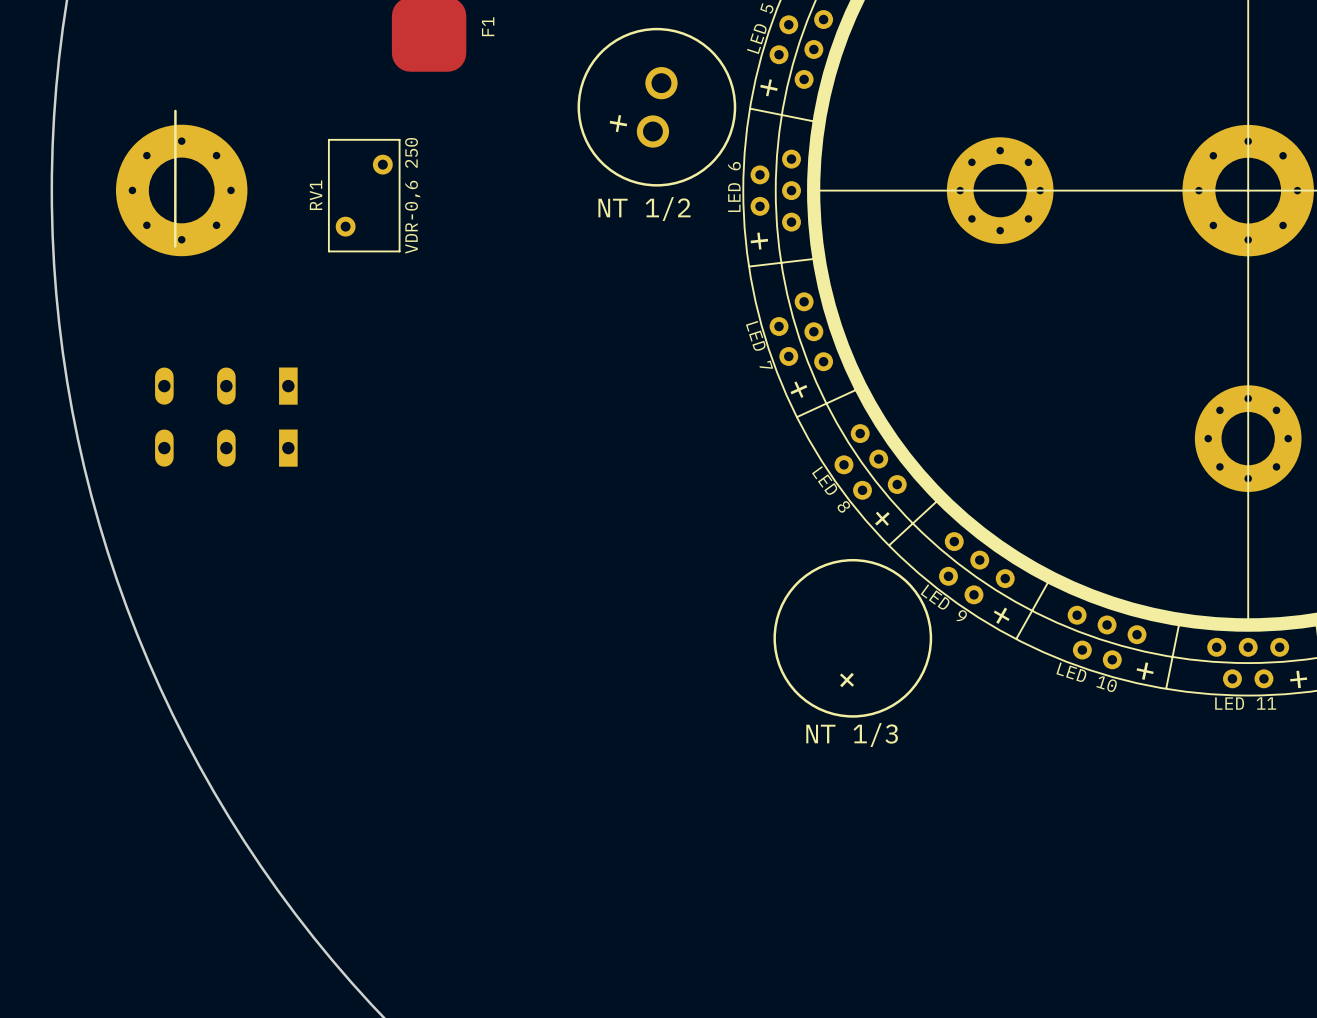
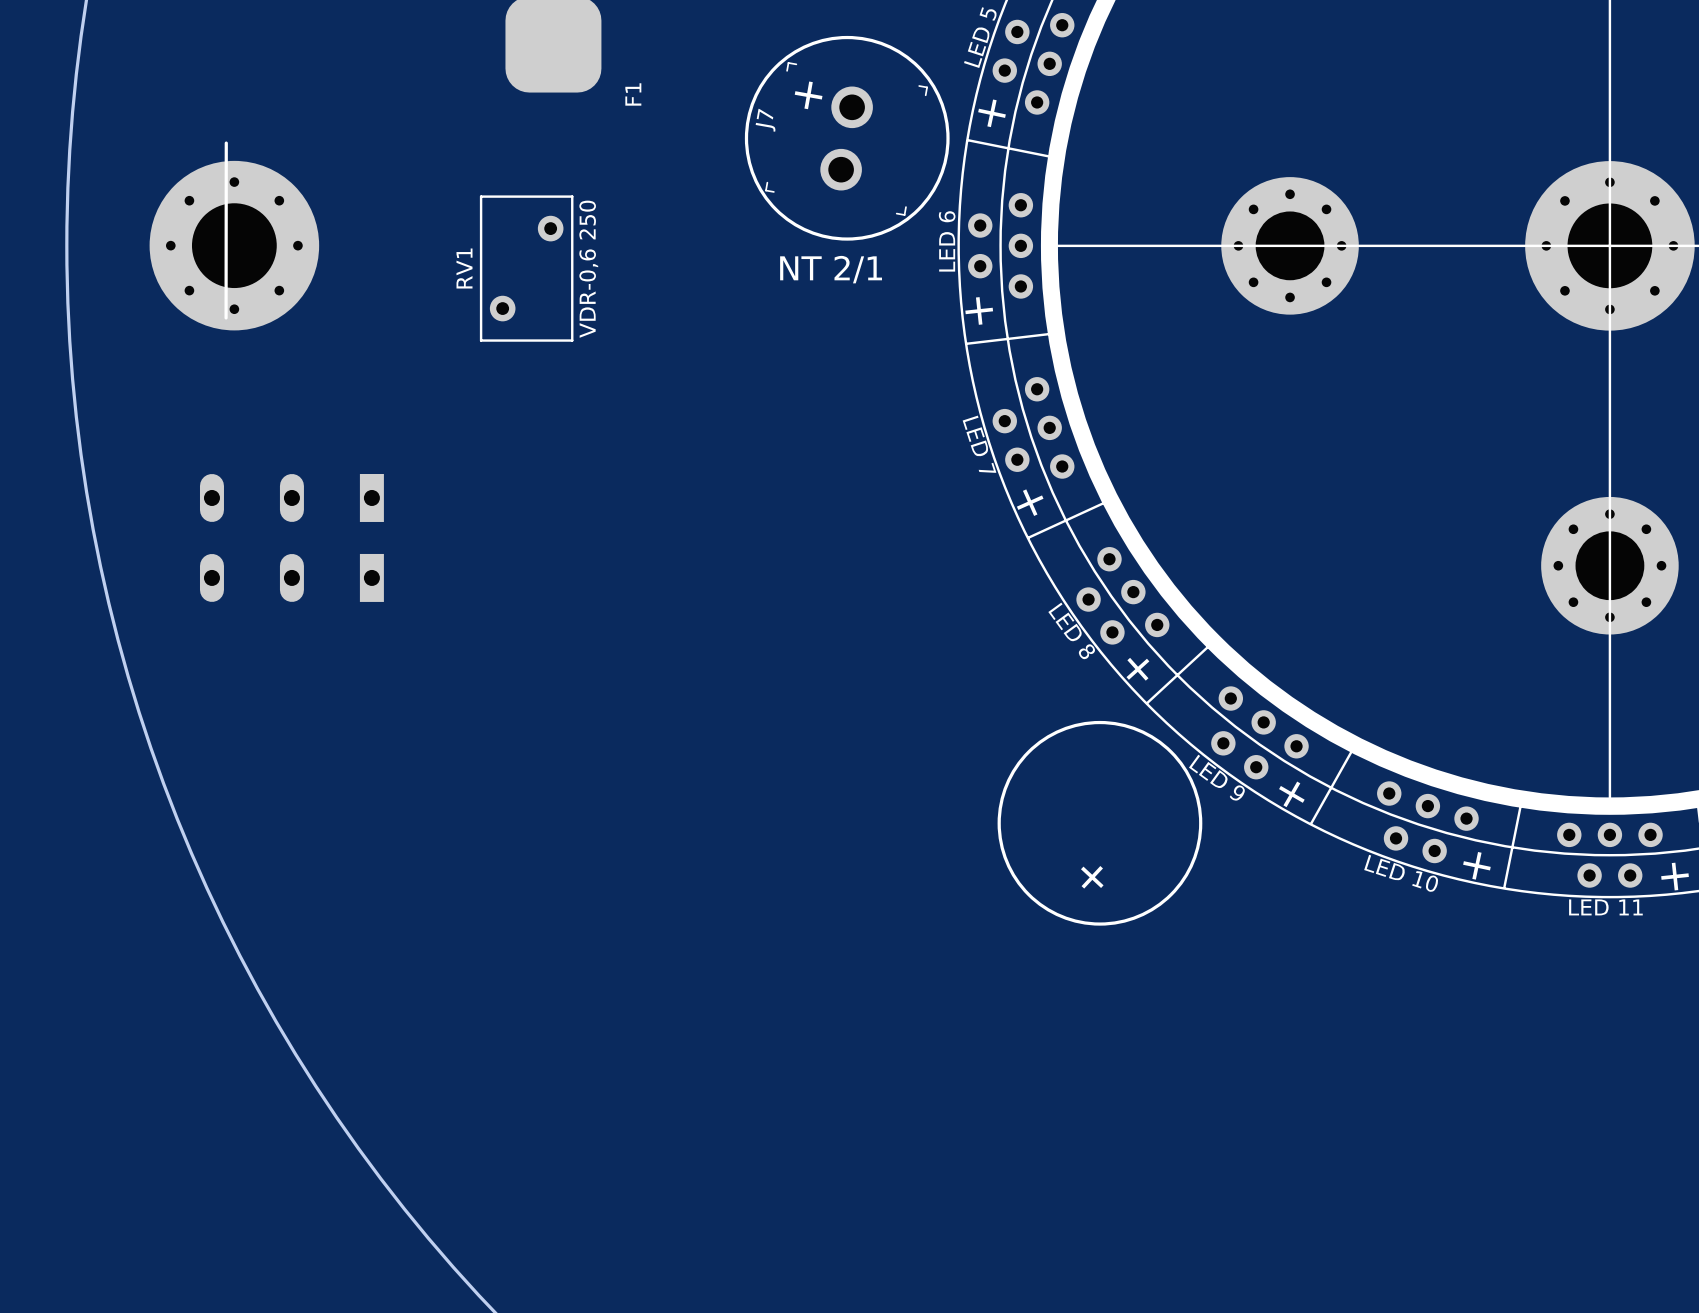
F1 name position: F1 (488, 26) -> F1 (633, 94)
J7: none -> (846, 138)
part: (657, 107) -> none
text position: + (618, 123) -> + (808, 95)
RV1 position: (364, 195) -> (526, 268)
text: NT 1/2 (644, 209) -> NT 2/1 (831, 269)
text: NT 1/3 (852, 735) -> none

